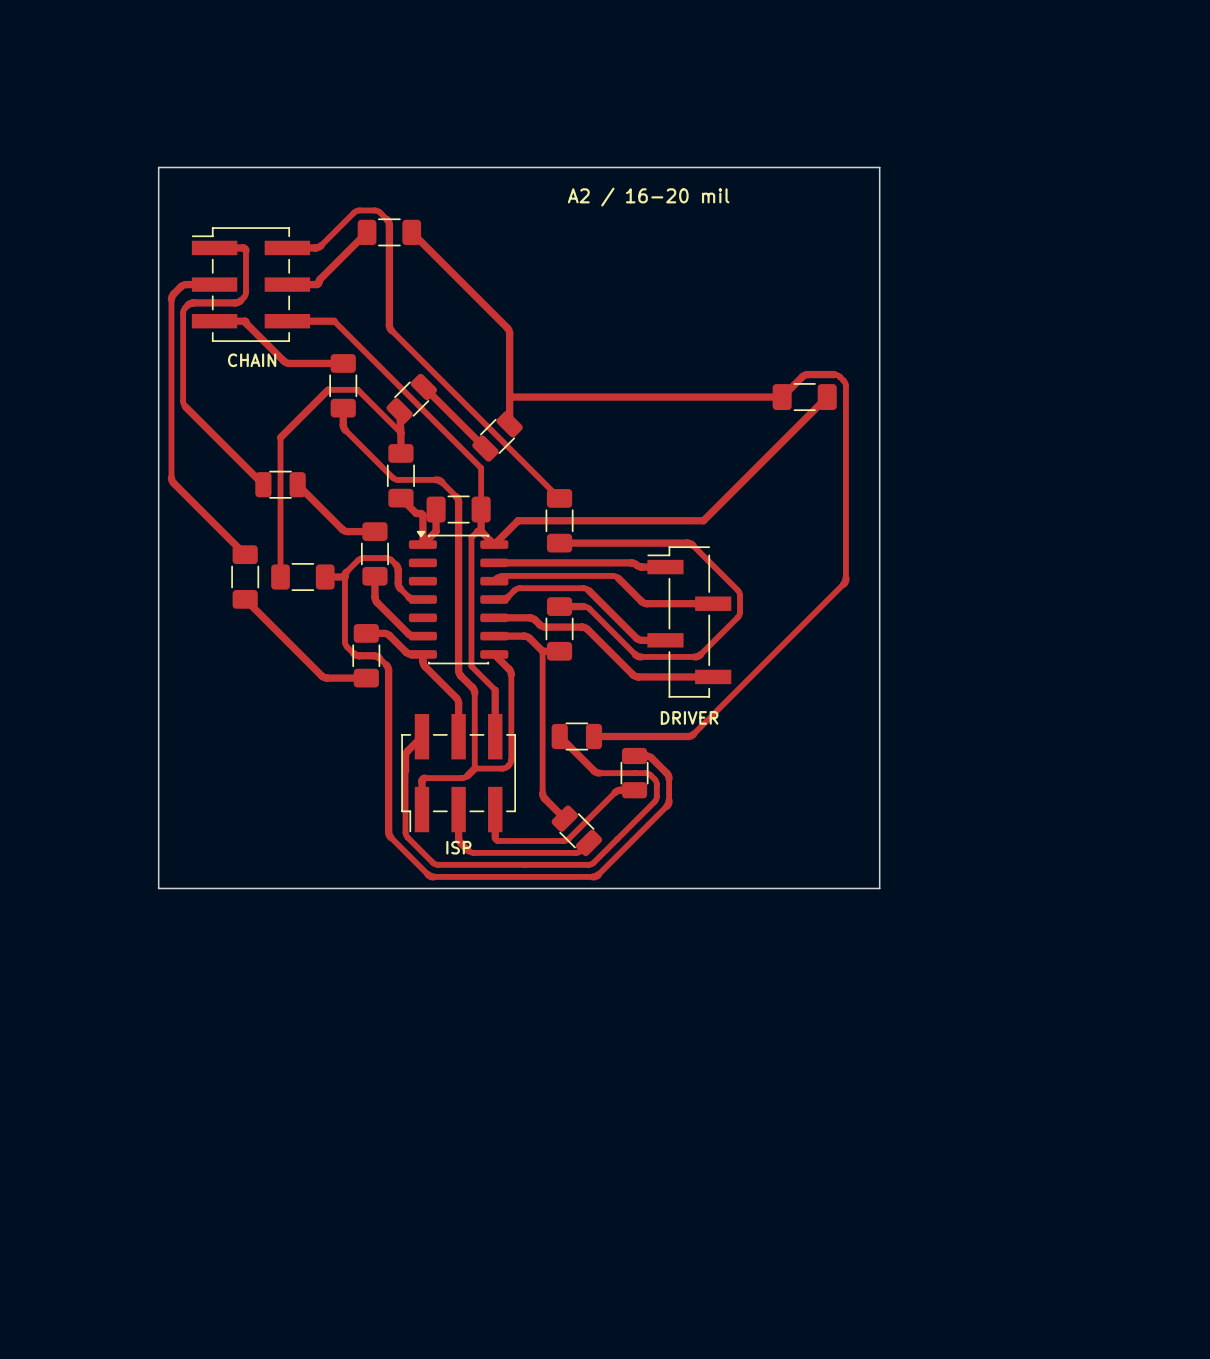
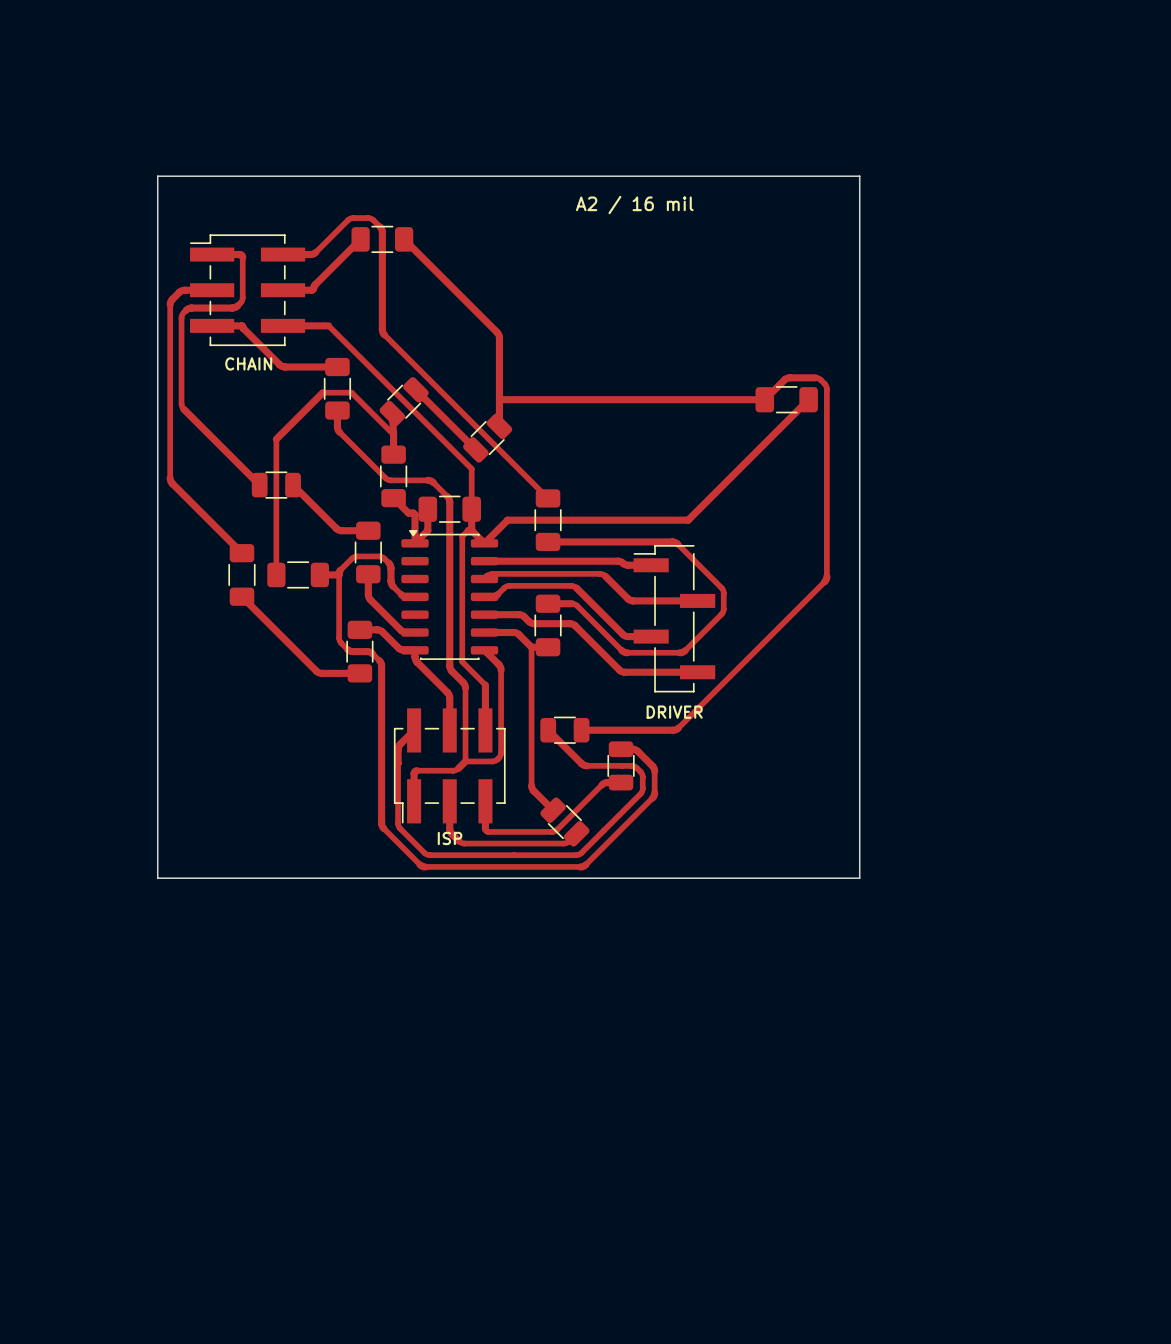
text: A2 / 16-20 mil (648, 197) -> A2 / 16 mil (634, 205)

